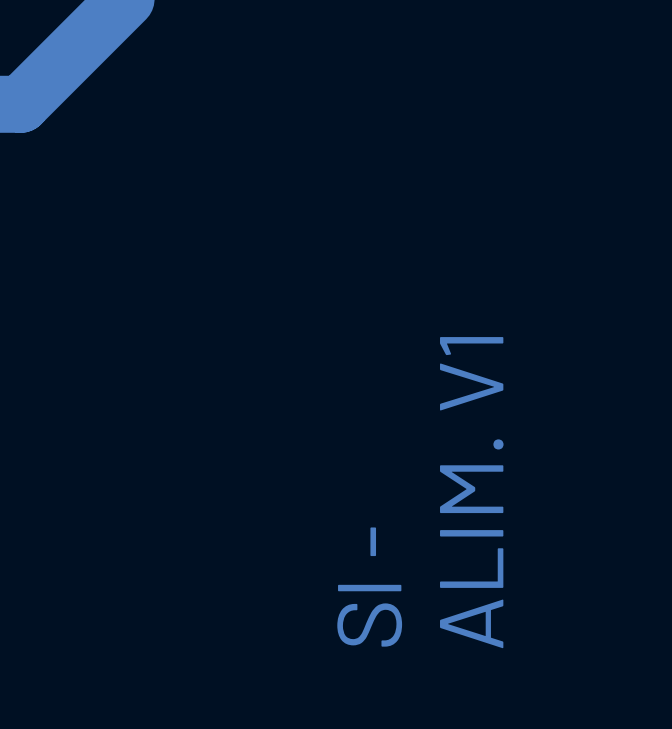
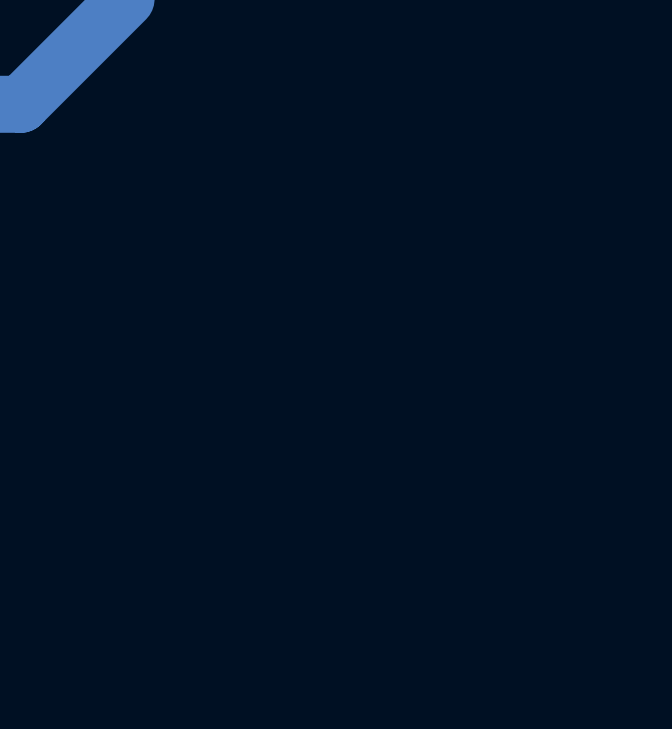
text: ALIM. V1 (471, 492) -> none
text: Sl - (369, 587) -> none

